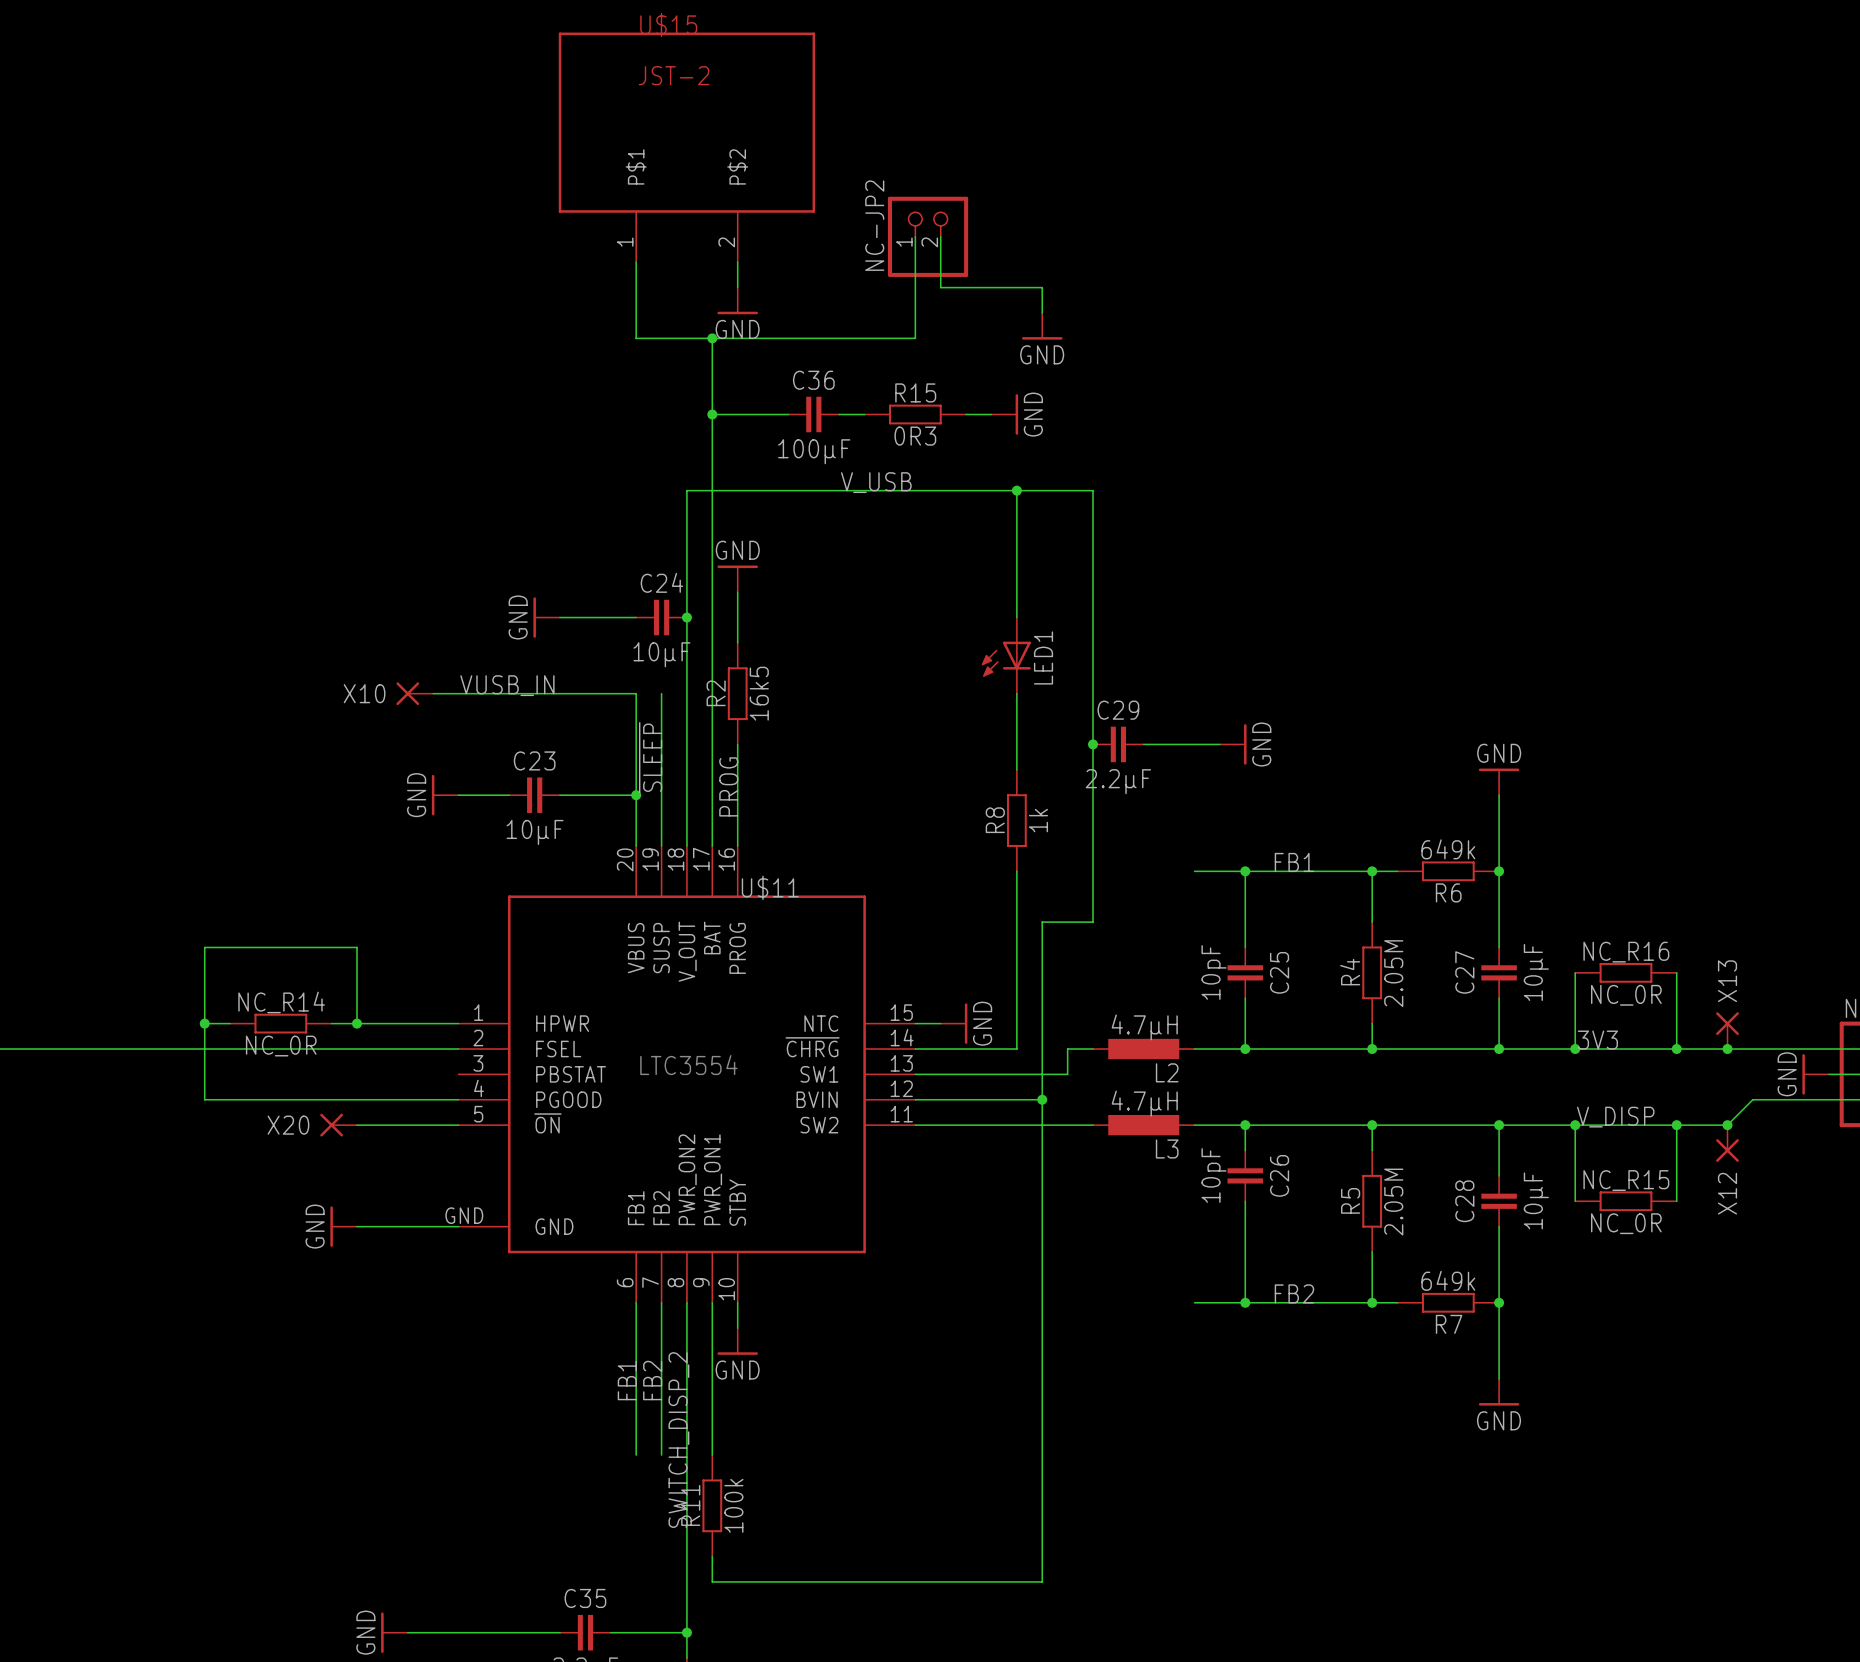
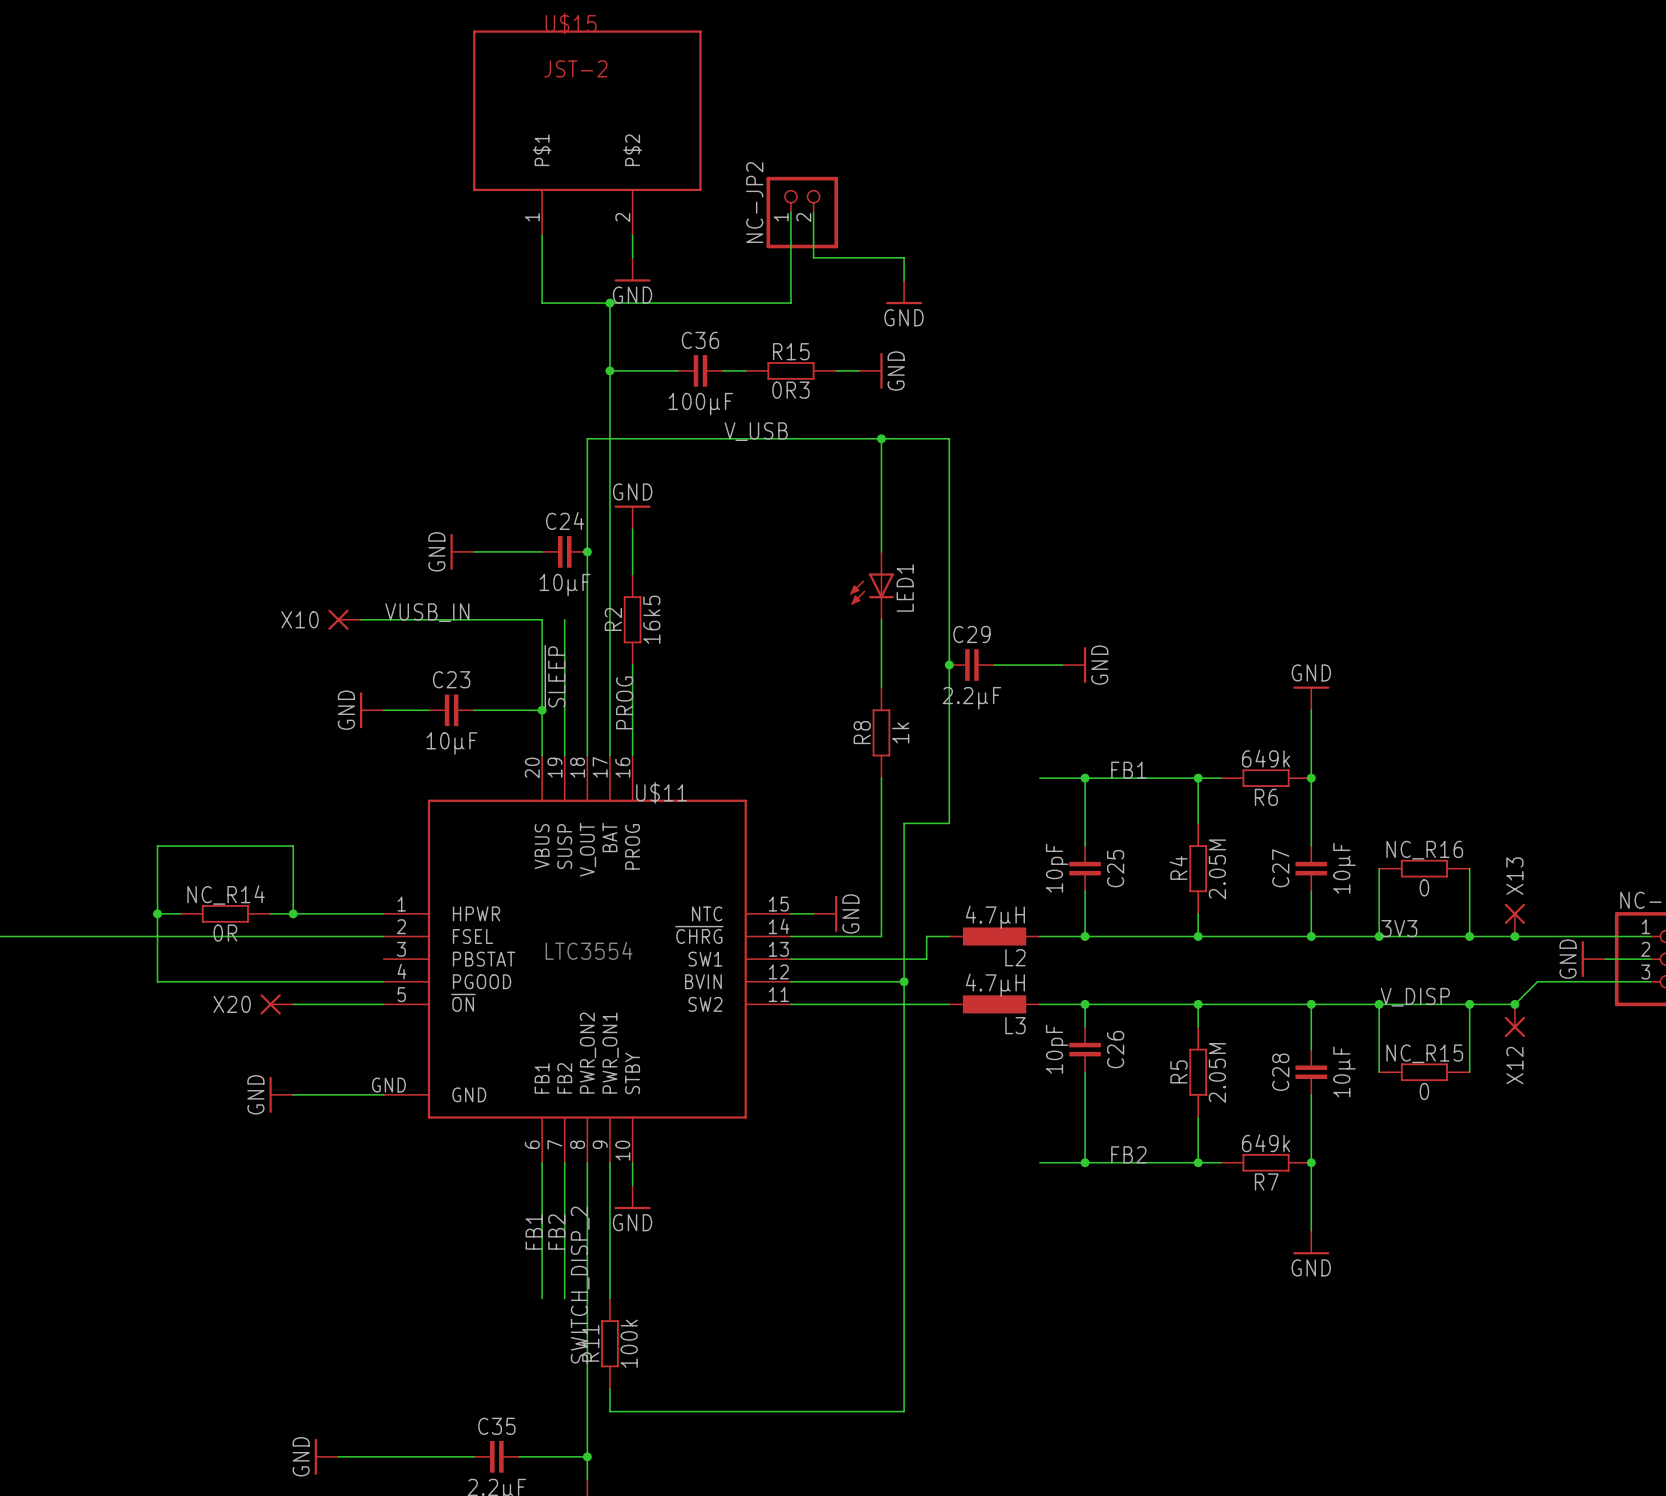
NC_R16 value: NC_0R (1626, 995) -> 0 (1424, 887)
NC_R14 value: NC_0R (281, 1046) -> 0R (225, 933)
NC_R15 value: NC_0R (1626, 1223) -> 0 (1424, 1091)

